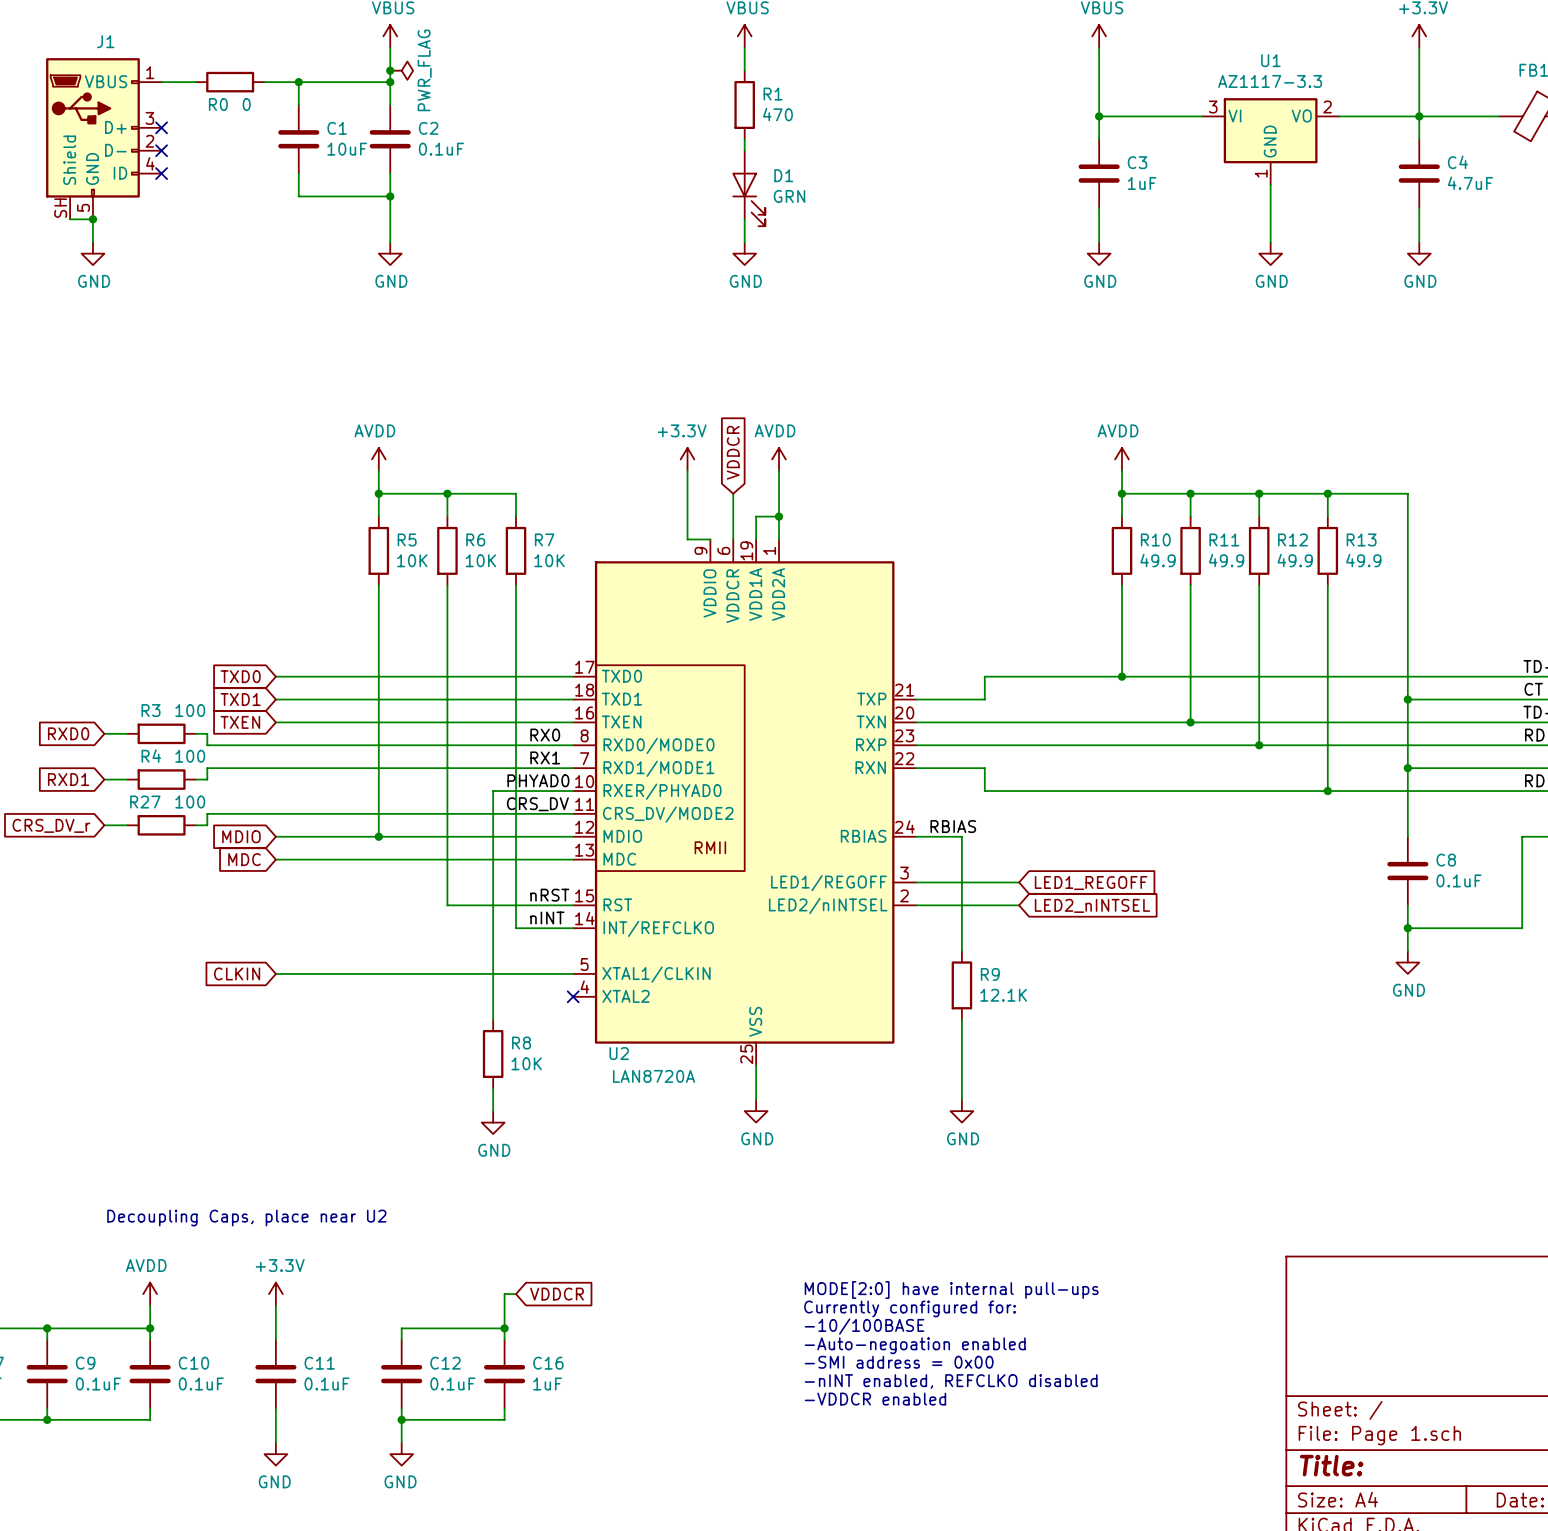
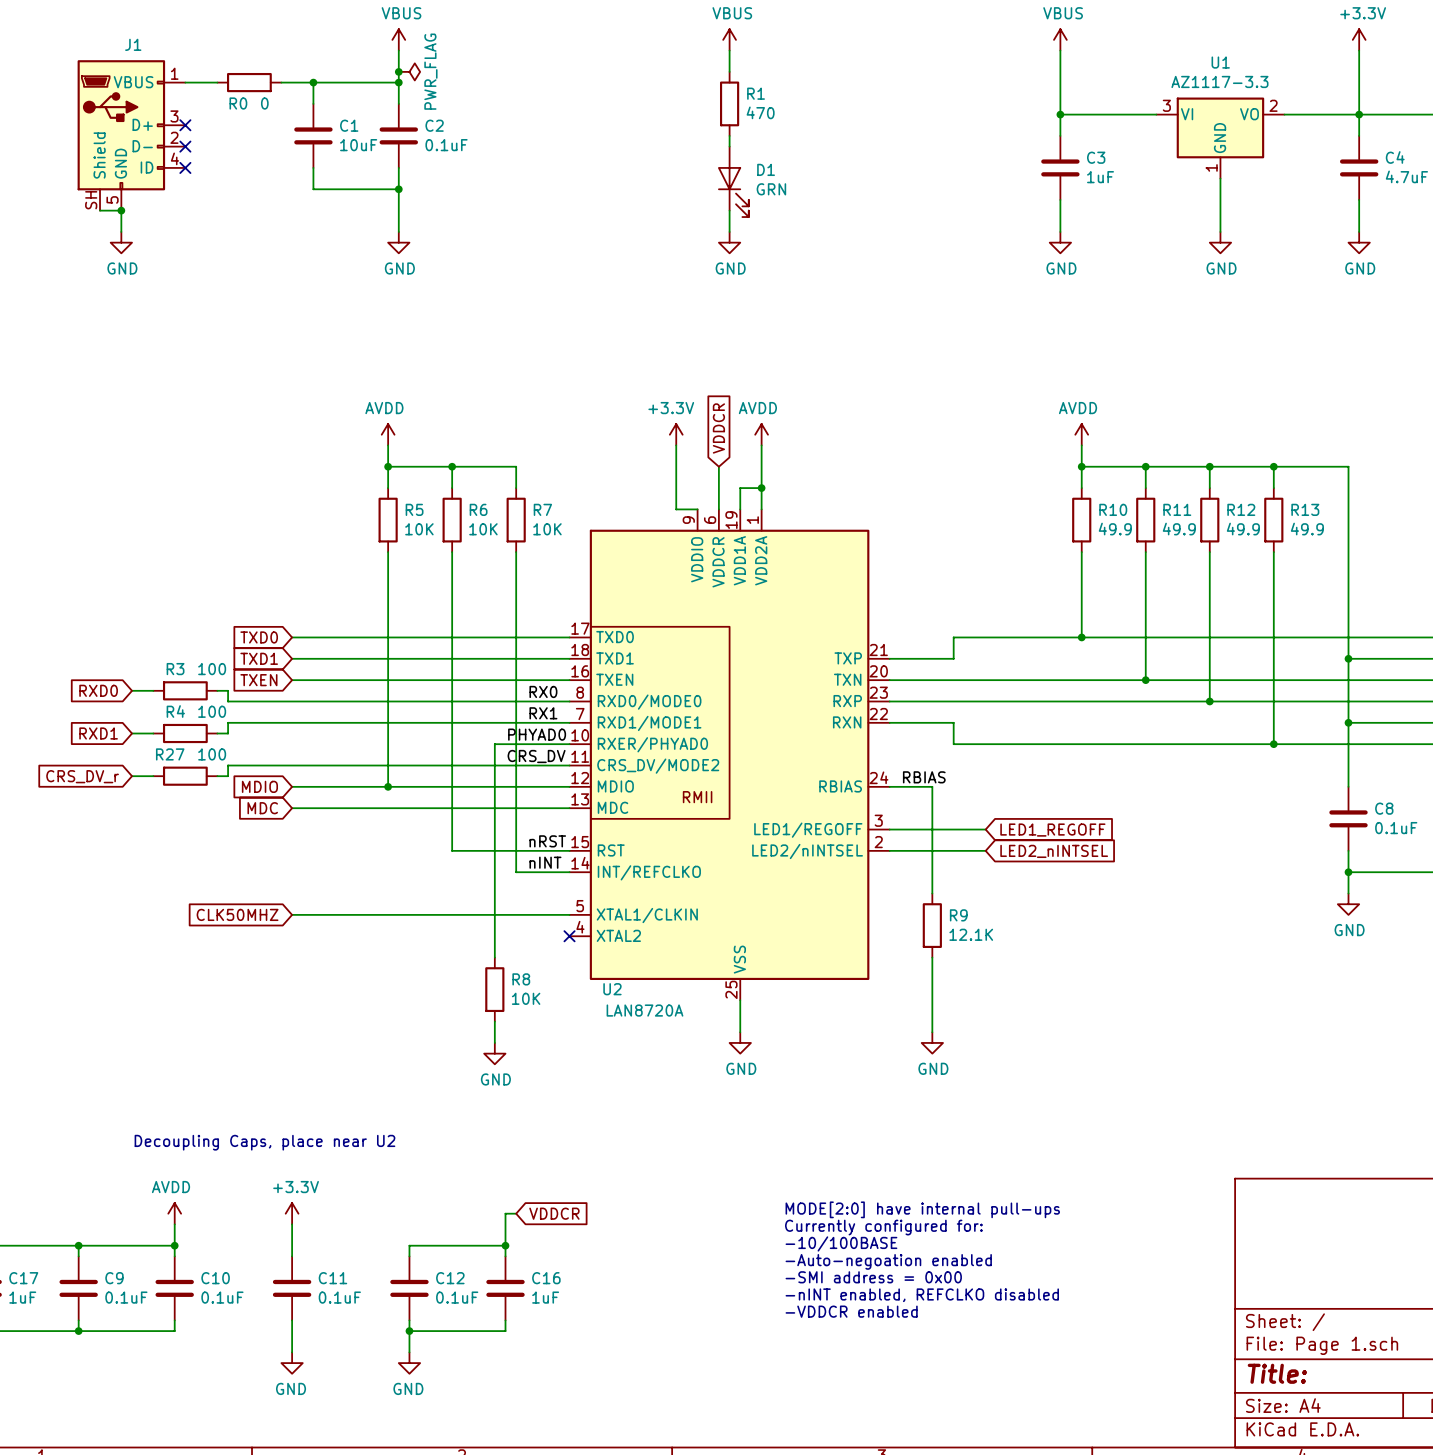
global label: CLKIN (237, 973) -> CLK50MHZ (237, 914)

